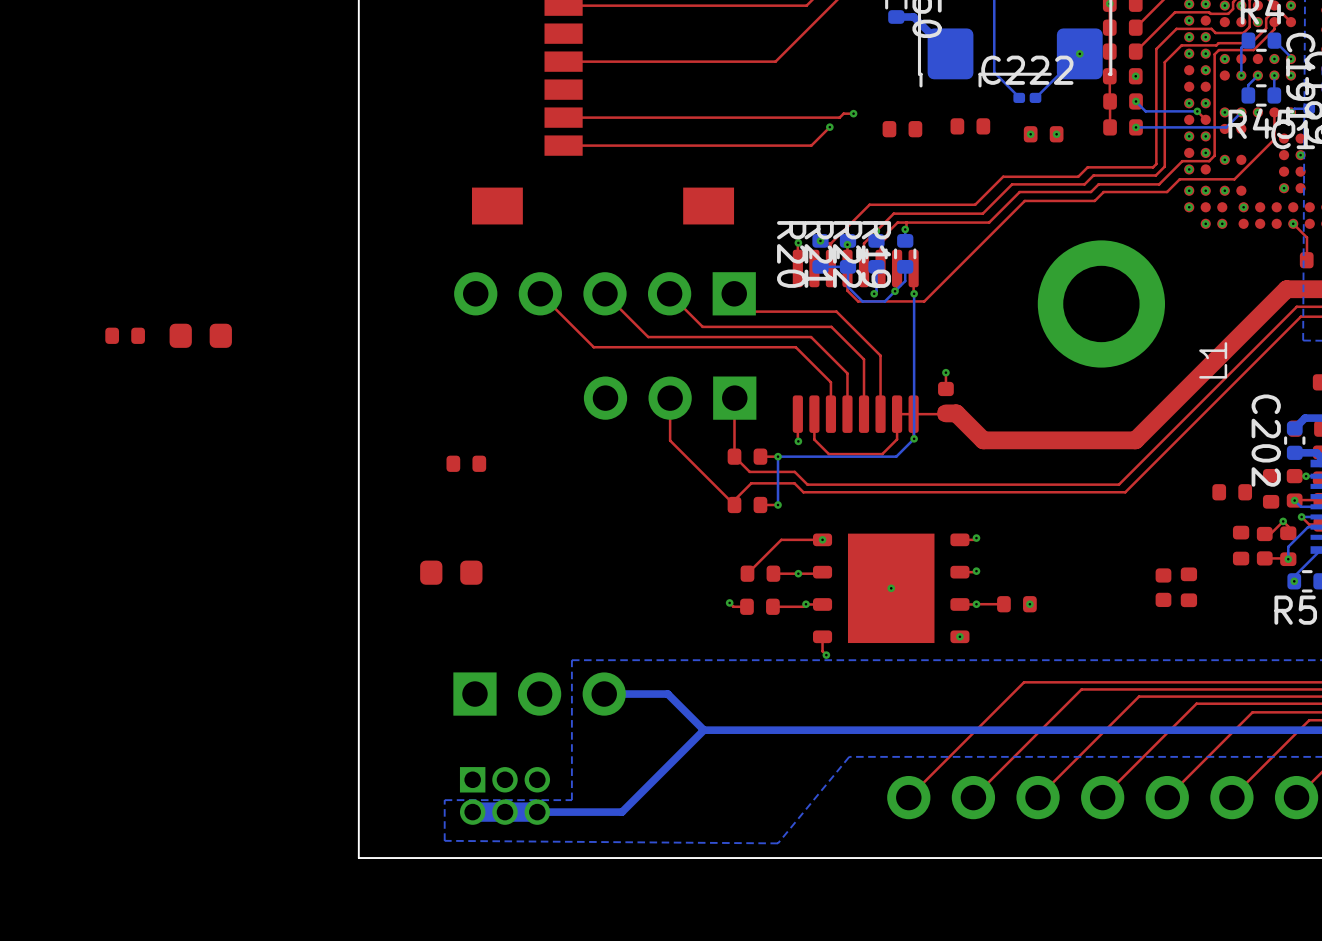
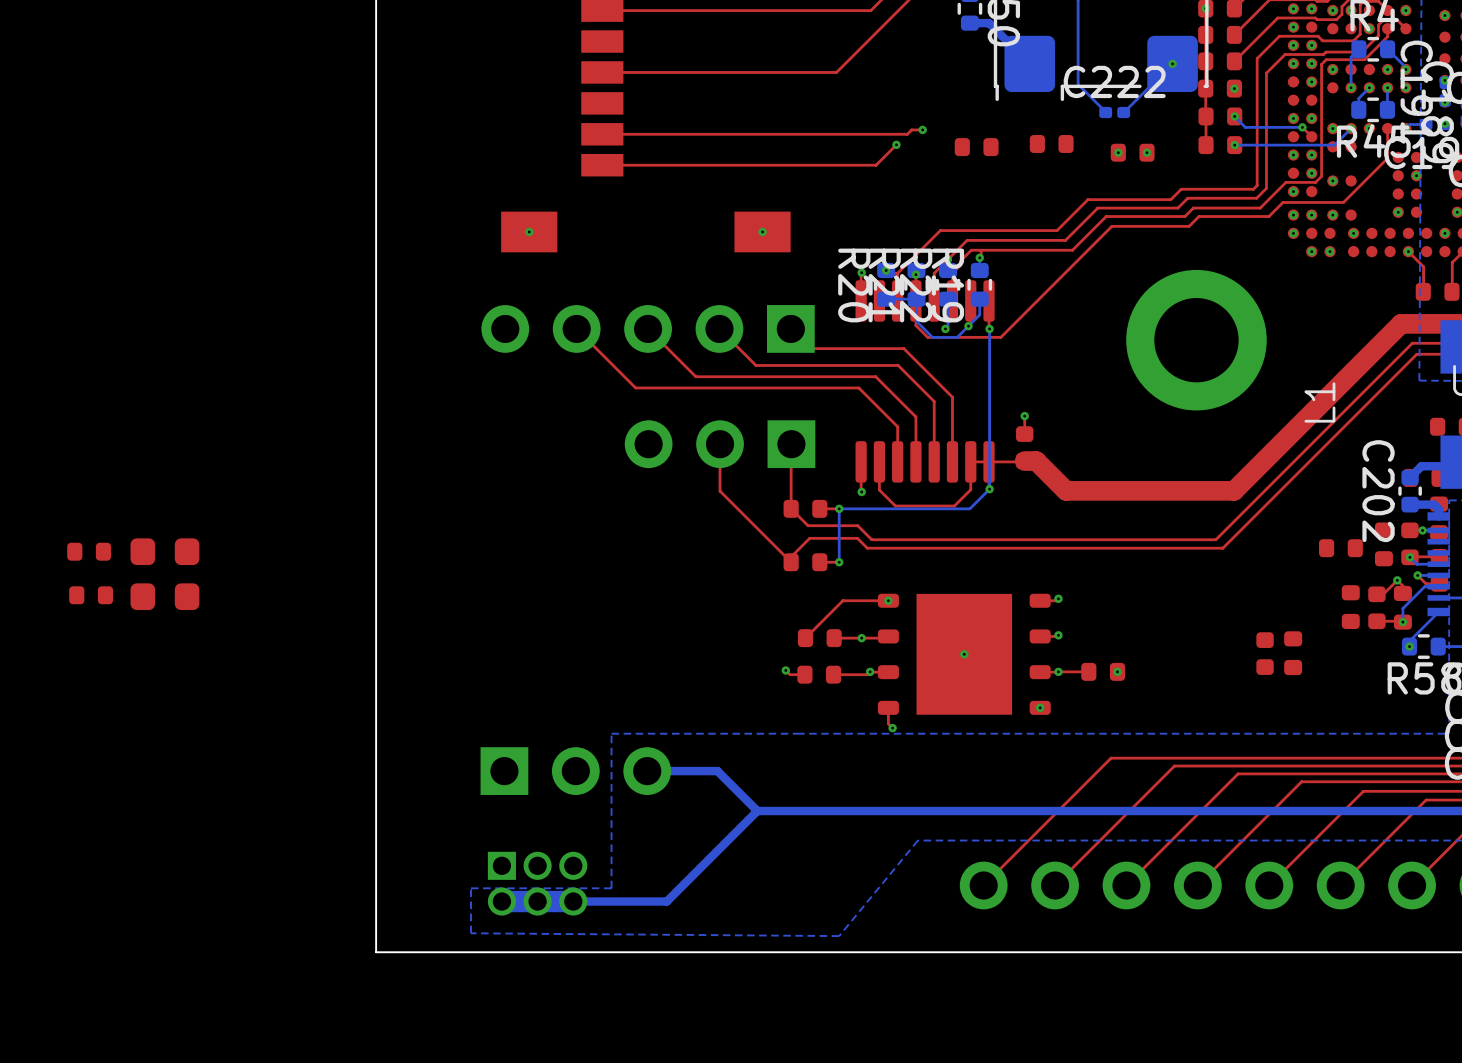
via: none -> (529, 231)
via: none -> (762, 231)
part: (125, 335) -> none
part: (200, 335) -> none
part: (466, 463) -> none
part: none -> (89, 551)
part: none -> (164, 551)
part: none -> (91, 595)
part: none -> (164, 596)
part: (451, 572) -> none

